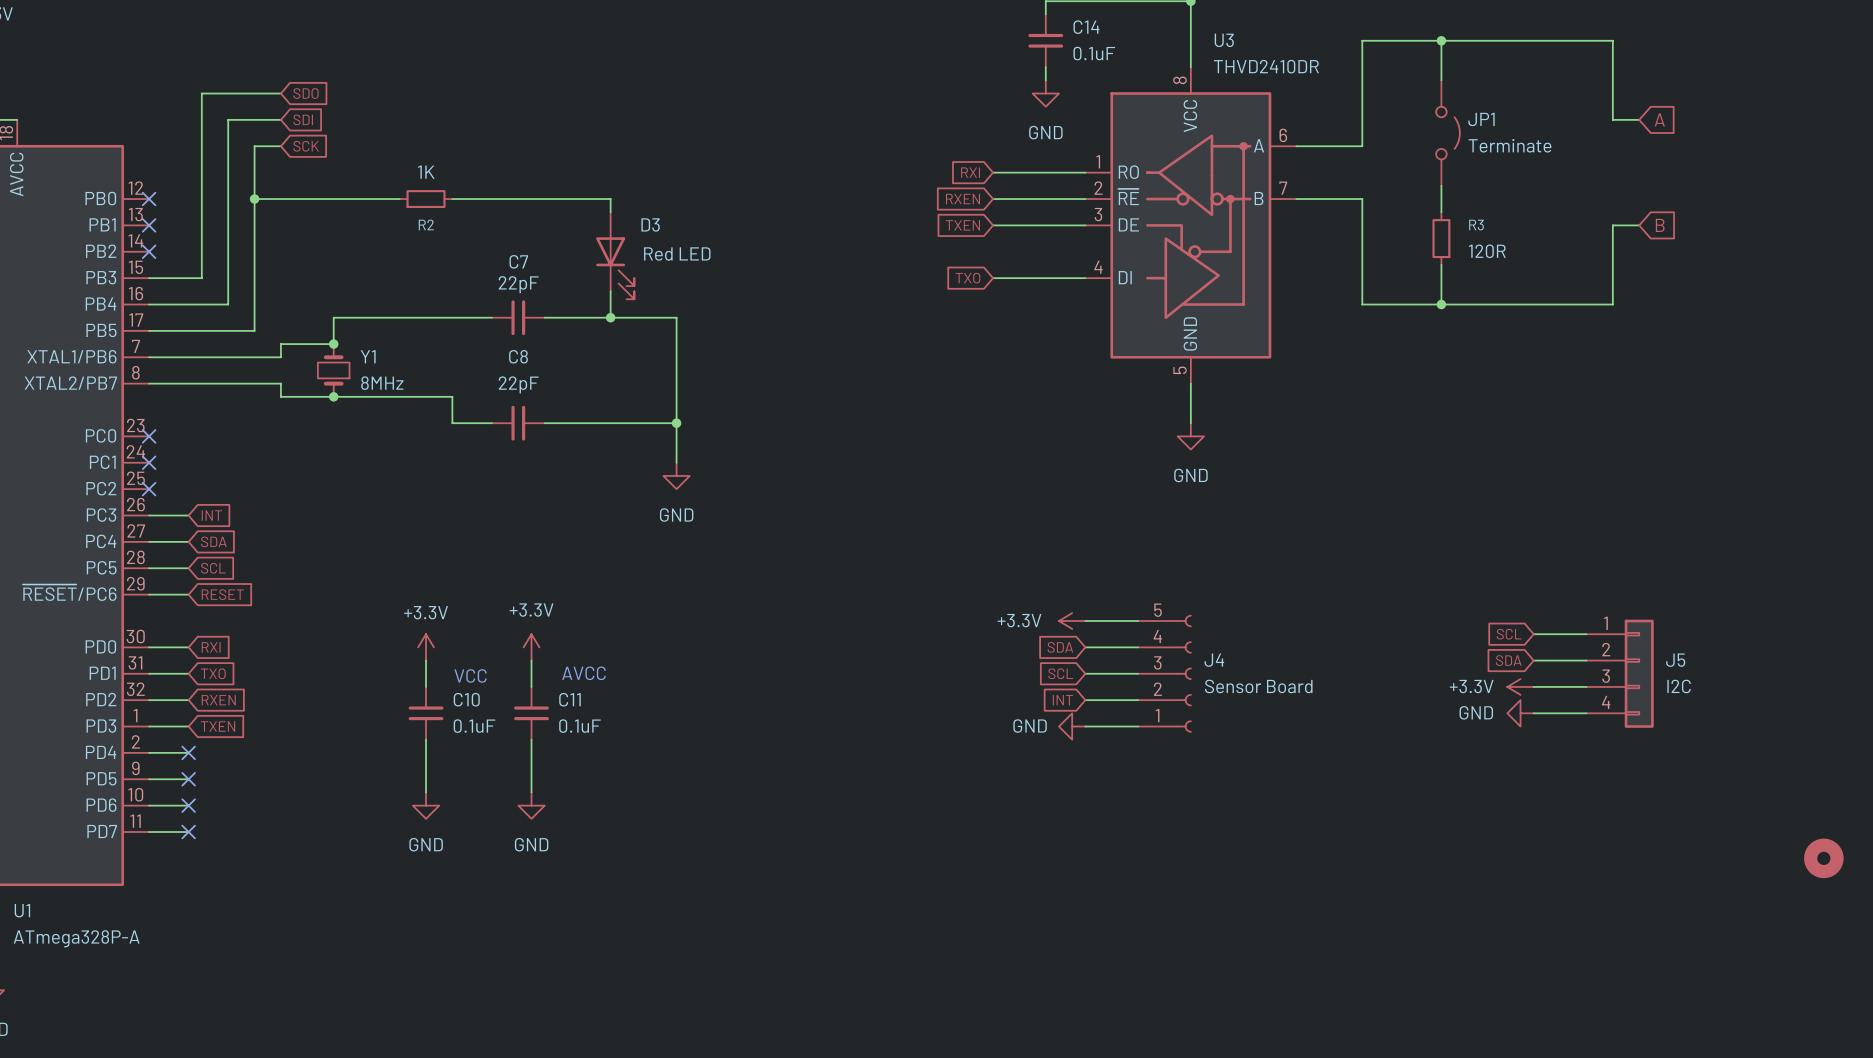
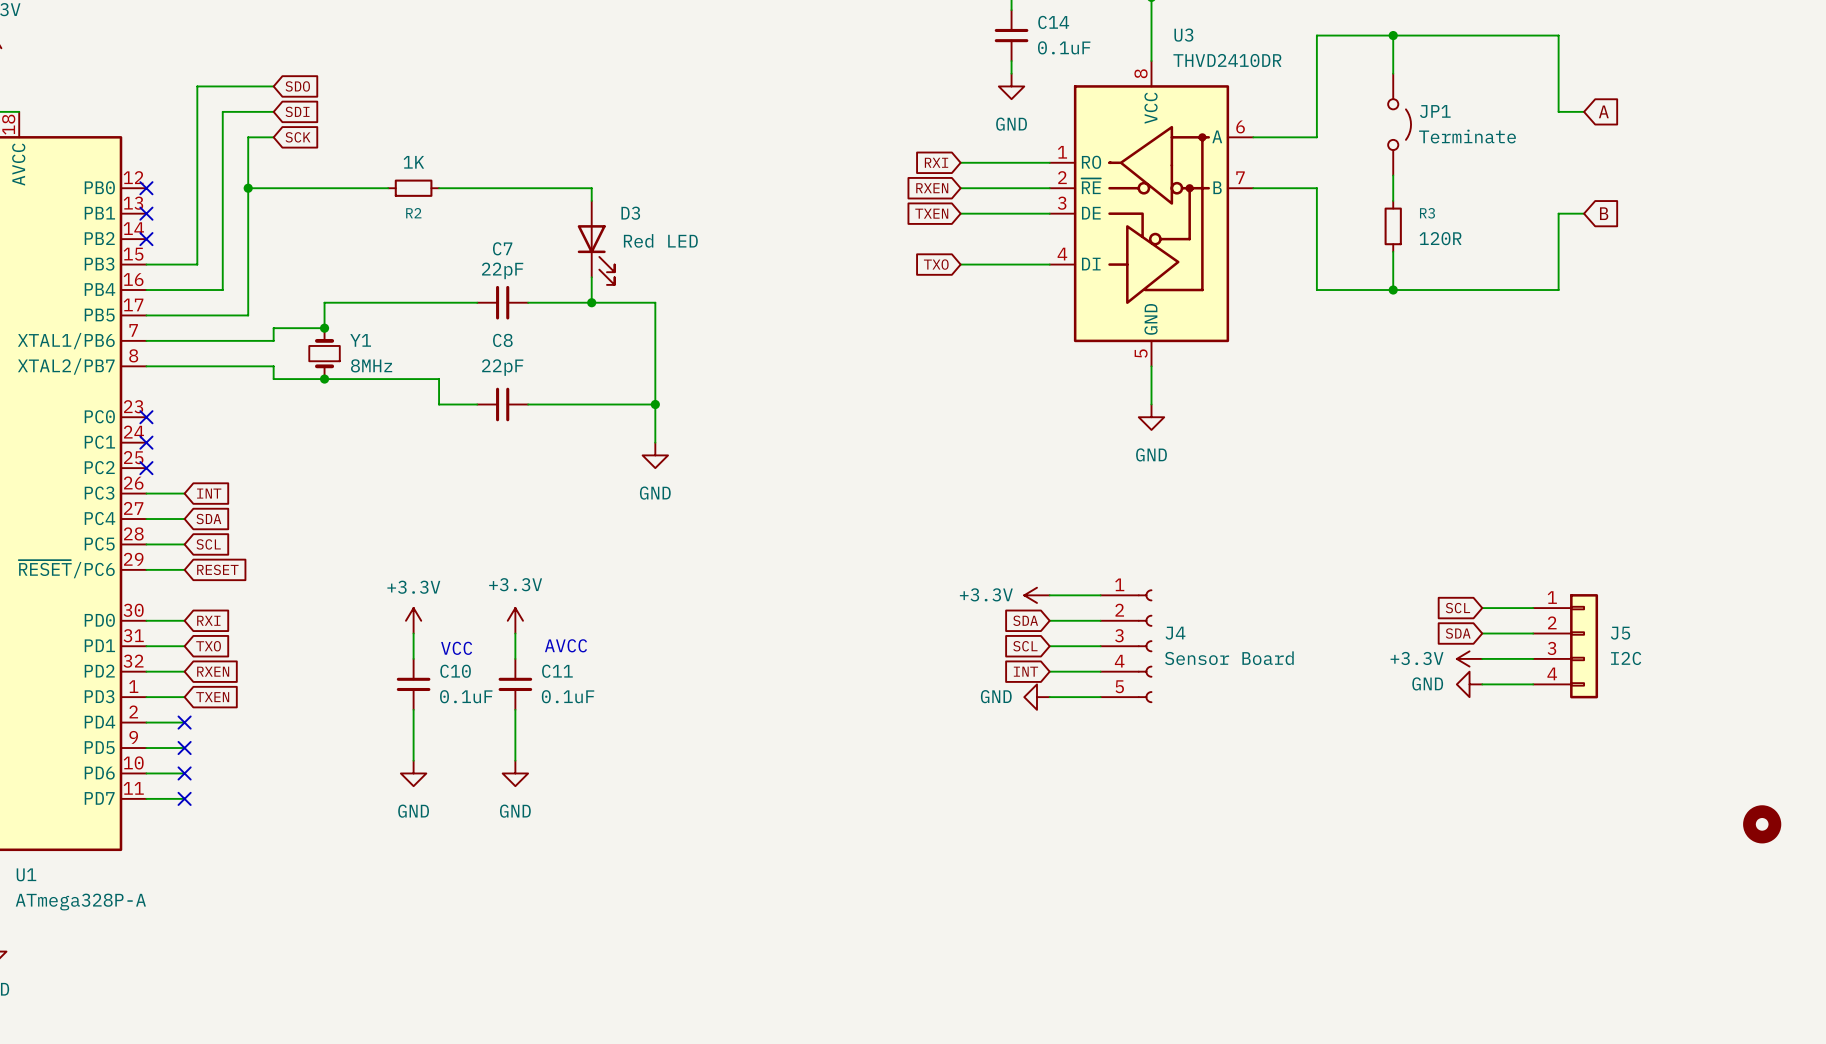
J4 flip: as is (1184, 673) -> up-down (1145, 646)

